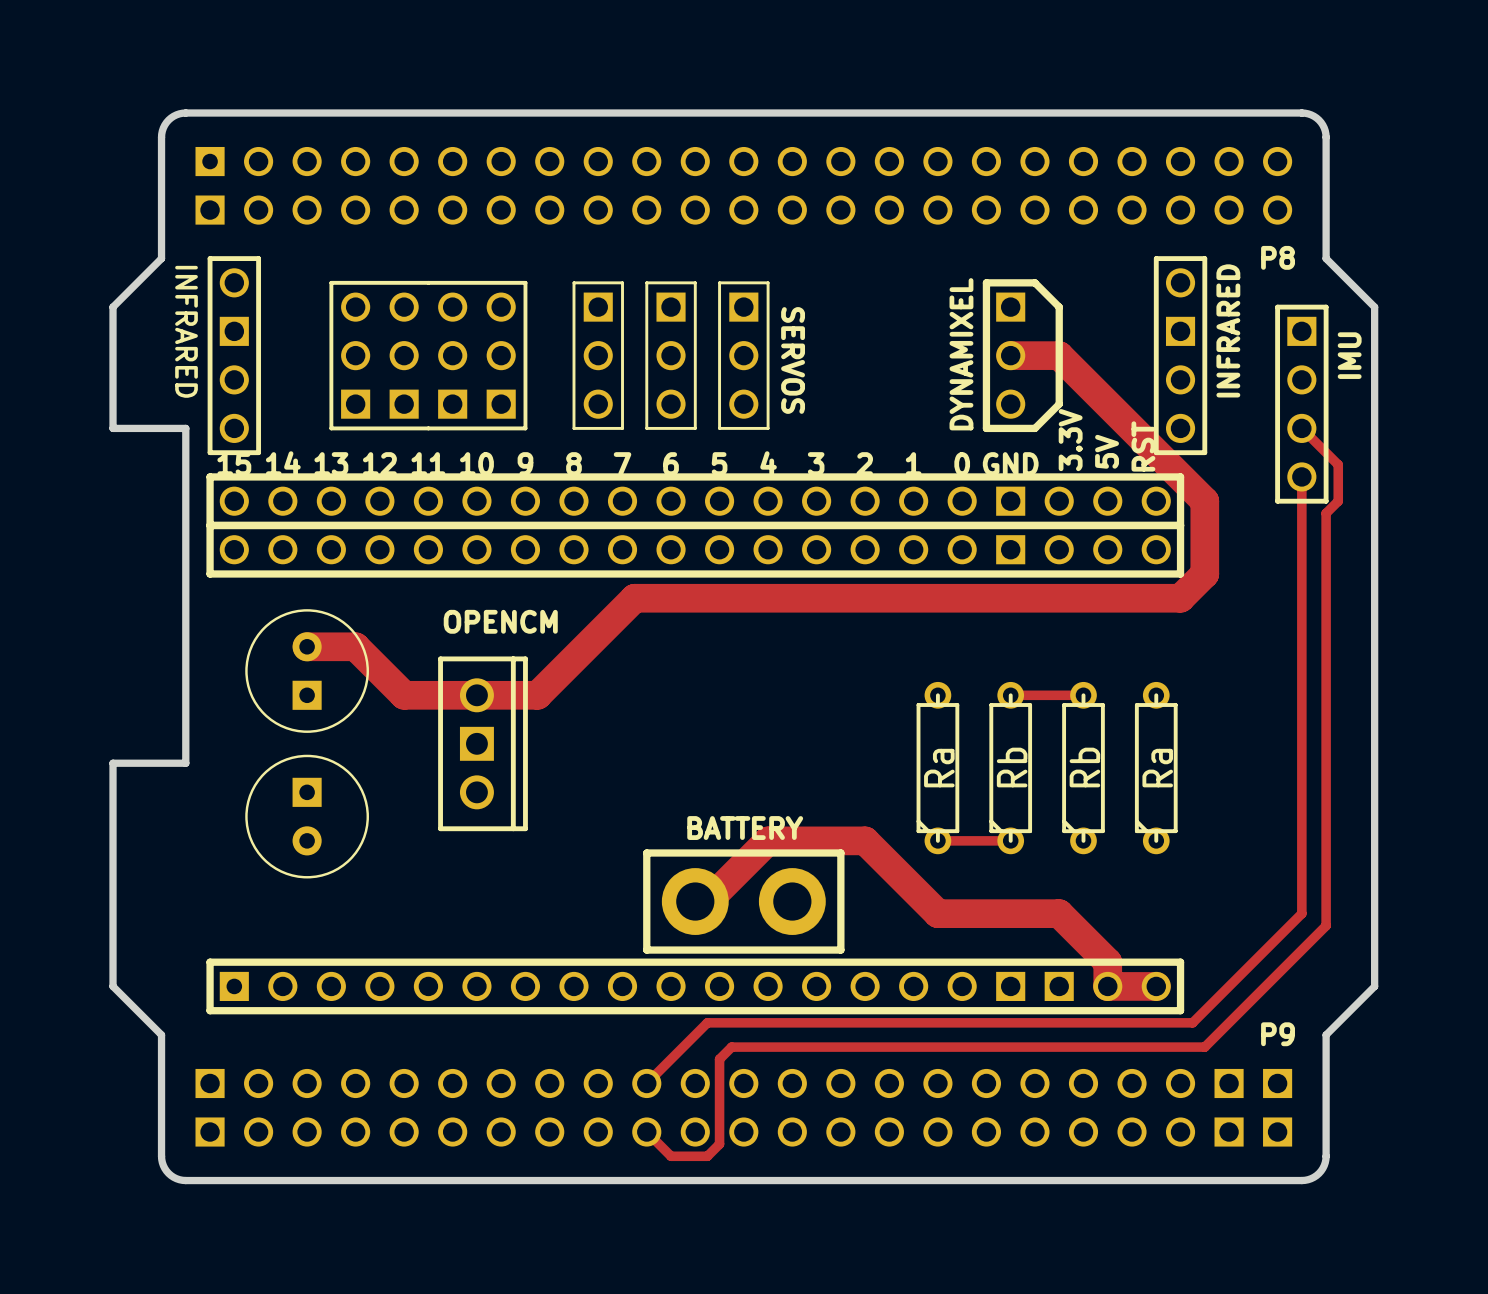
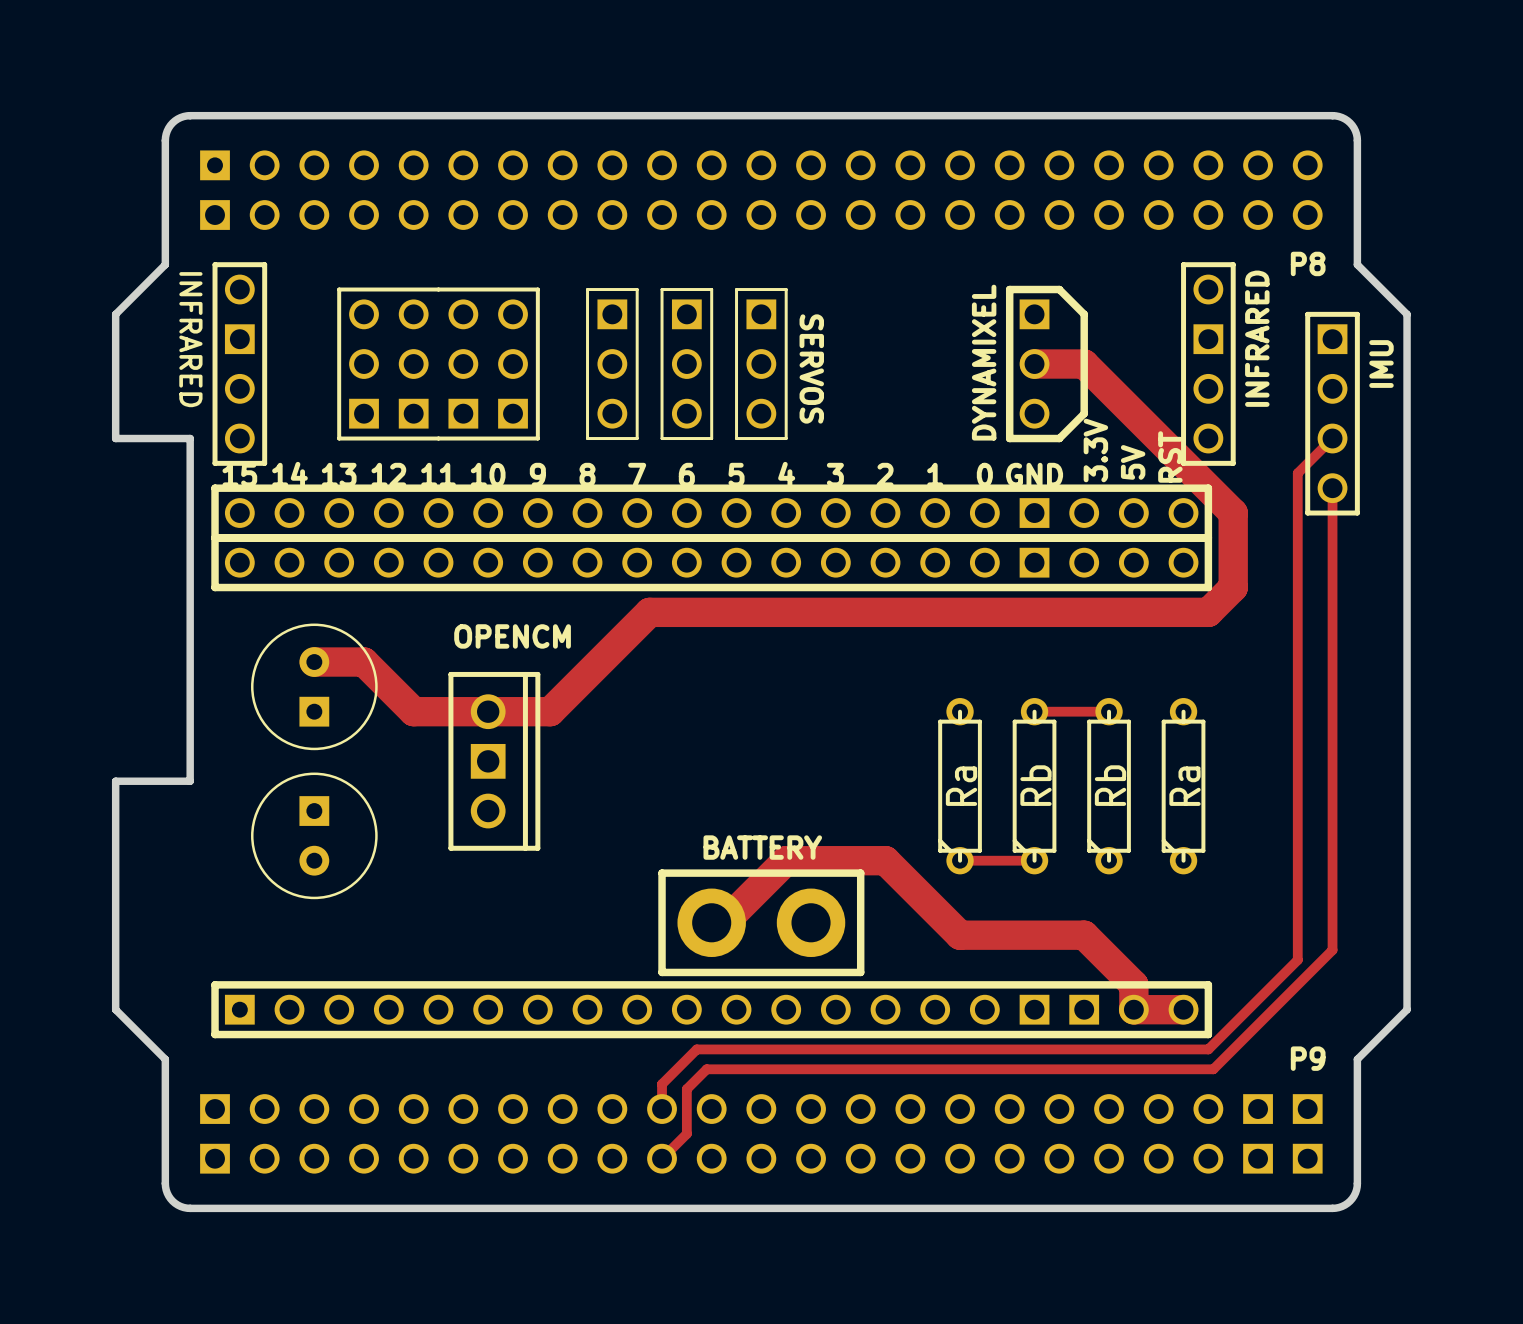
track: (1301, 428) (1338, 464) (1338, 501) (1326, 513) (1326, 925) (1204, 1047) (731, 1047) (719, 1059) (719, 1144) (707, 1156) (671, 1156) (646, 1132) -> (1332, 438) (1297, 473) (1297, 960) (1208, 1049) (696, 1049) (662, 1084) (662, 1109)
track: (1301, 913) (1192, 1022) (707, 1022) (646, 1083) -> (1332, 935) (1332, 950) (1213, 1069) (706, 1069) (686, 1089) (686, 1133) (662, 1158)

